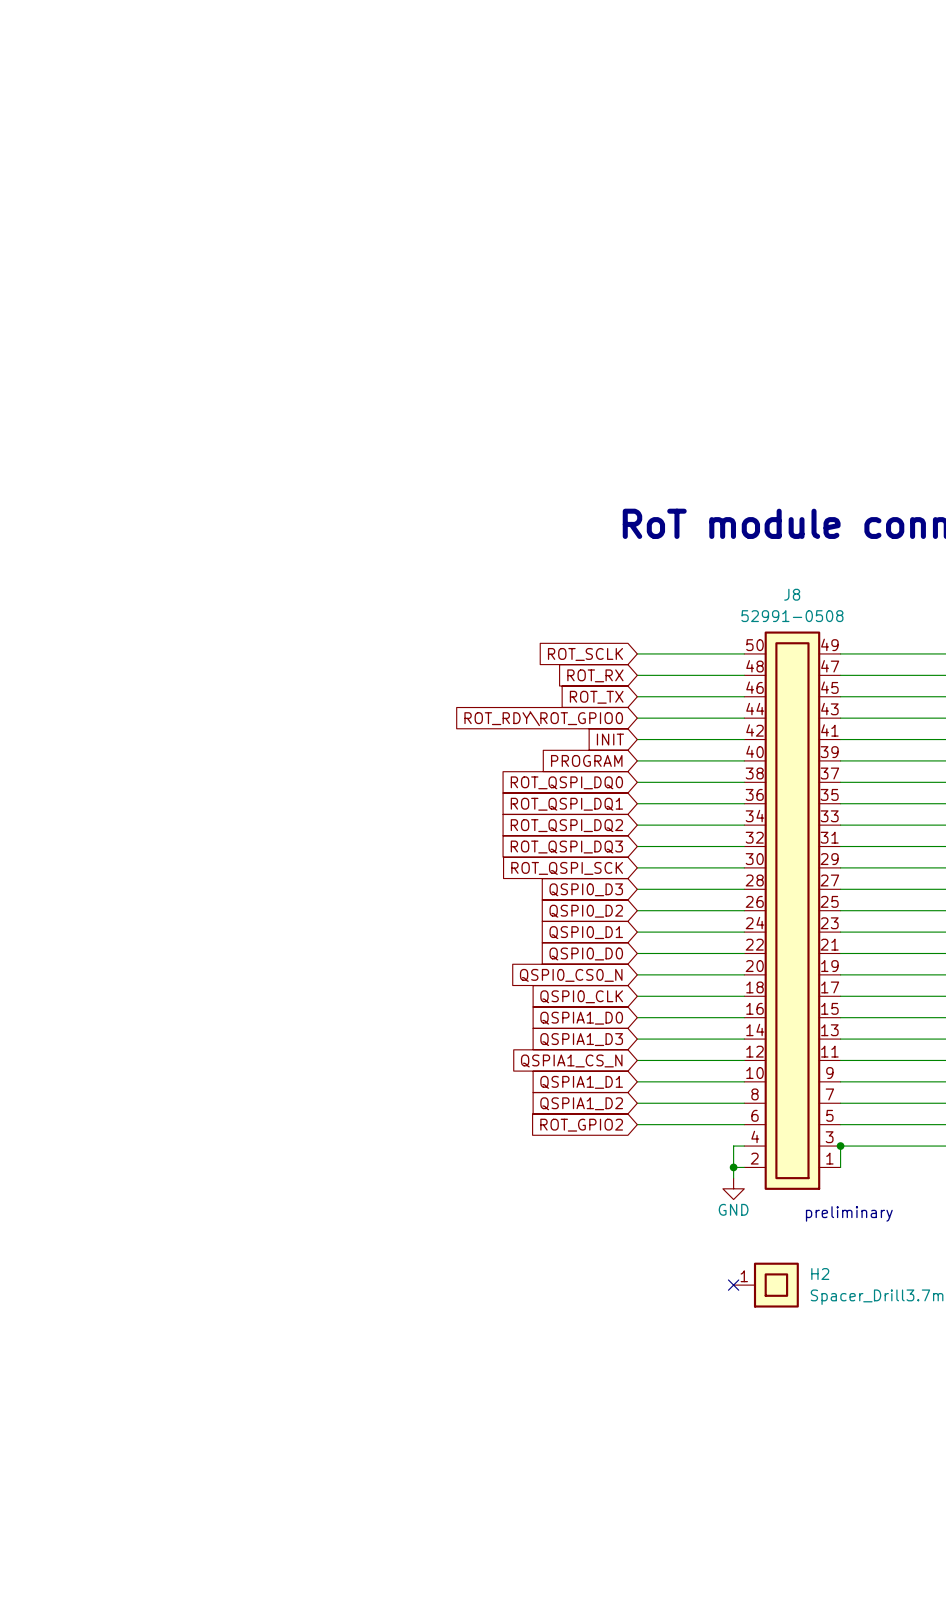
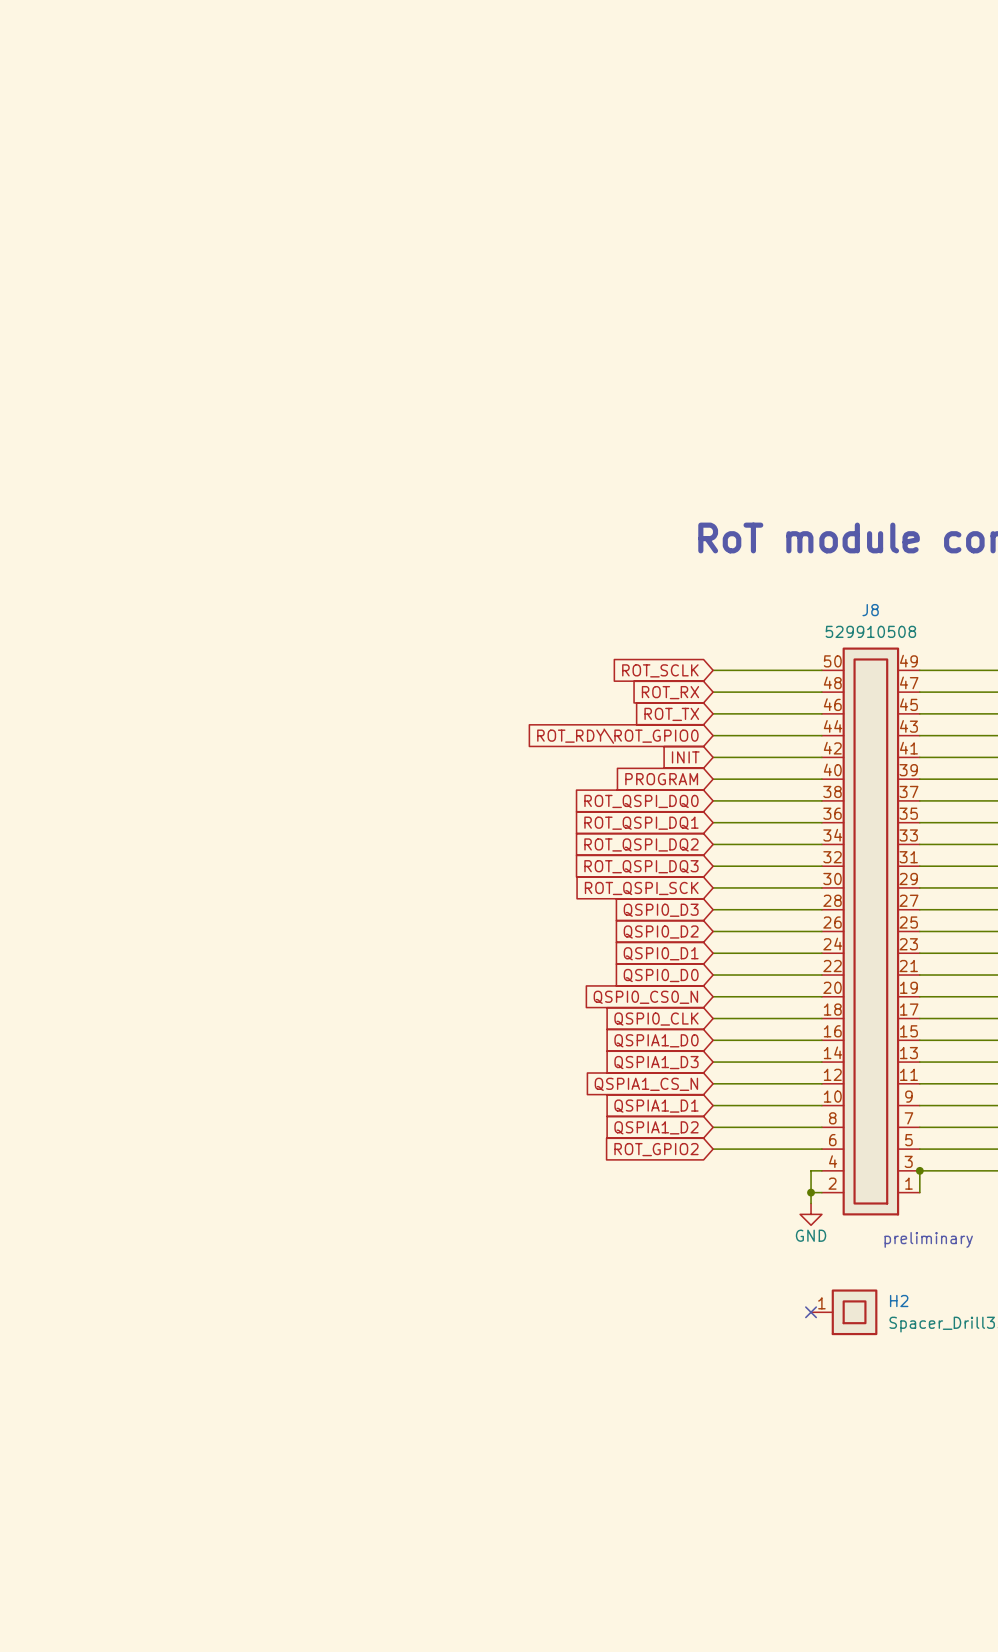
J8 text: 52991-0508 (792, 616) -> 529910508 (870, 631)

